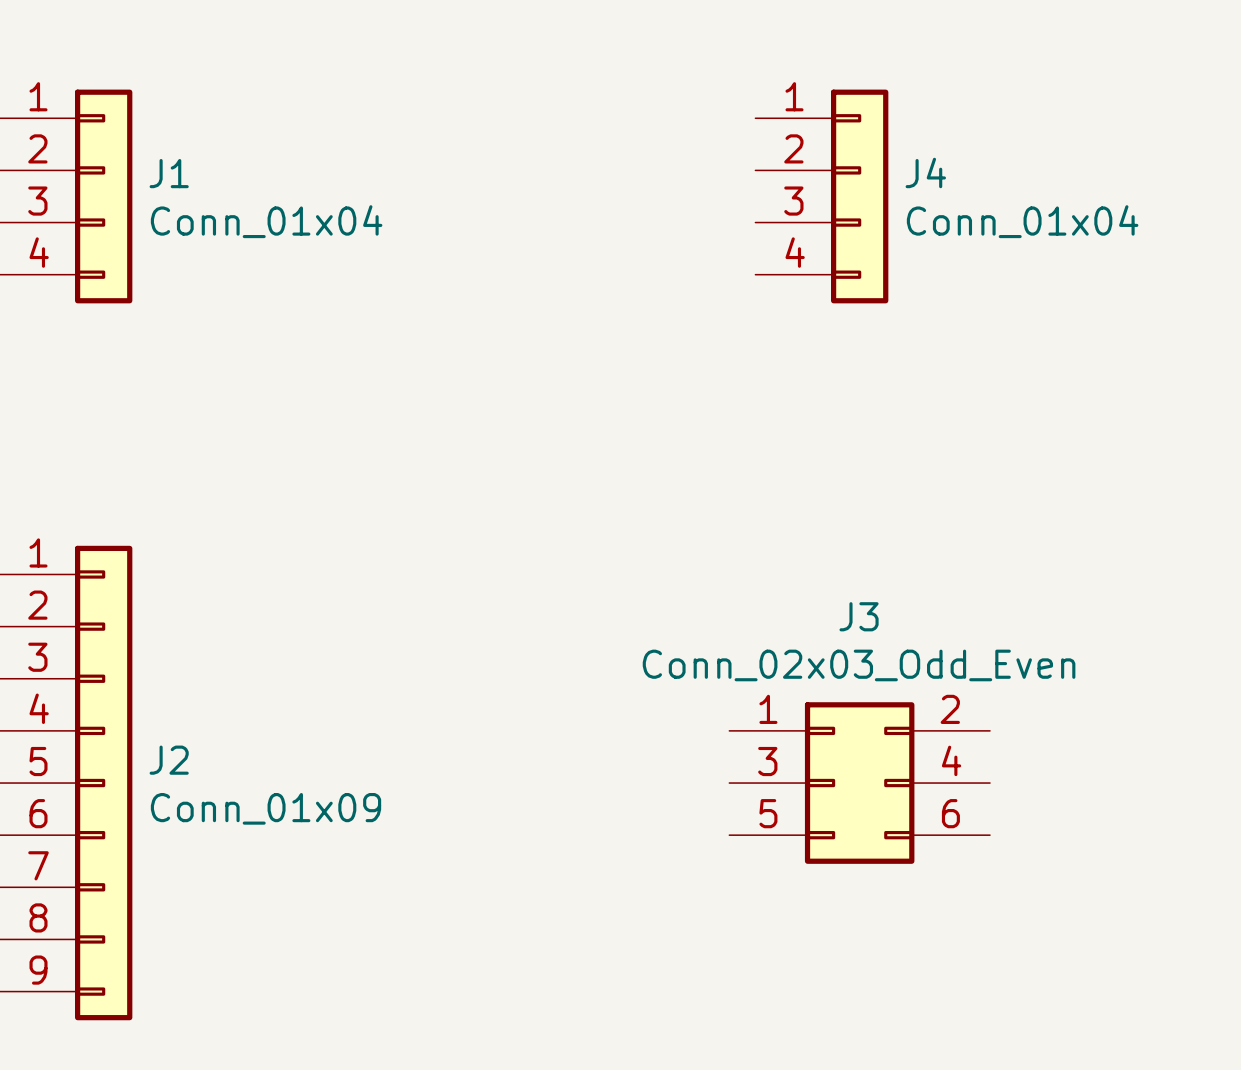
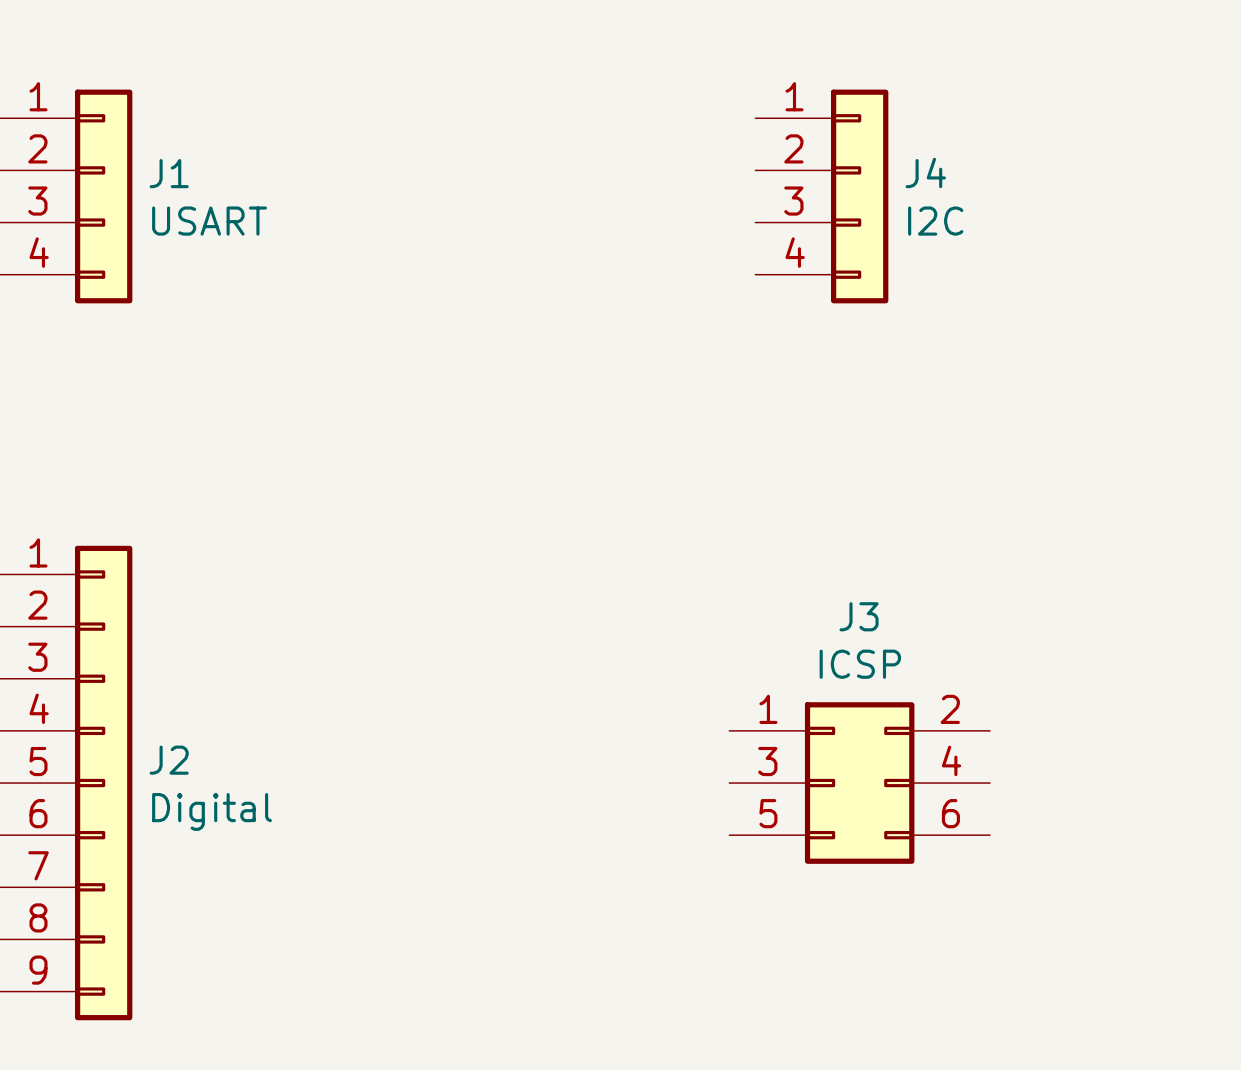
J1 value: Conn_01x04 (266, 221) -> USART (209, 221)
J4 value: Conn_01x04 (1022, 221) -> I2C (935, 221)
J3 value: Conn_02x03_Odd_Even (859, 665) -> ICSP (860, 664)
J2 value: Conn_01x09 (265, 808) -> Digital (211, 811)

